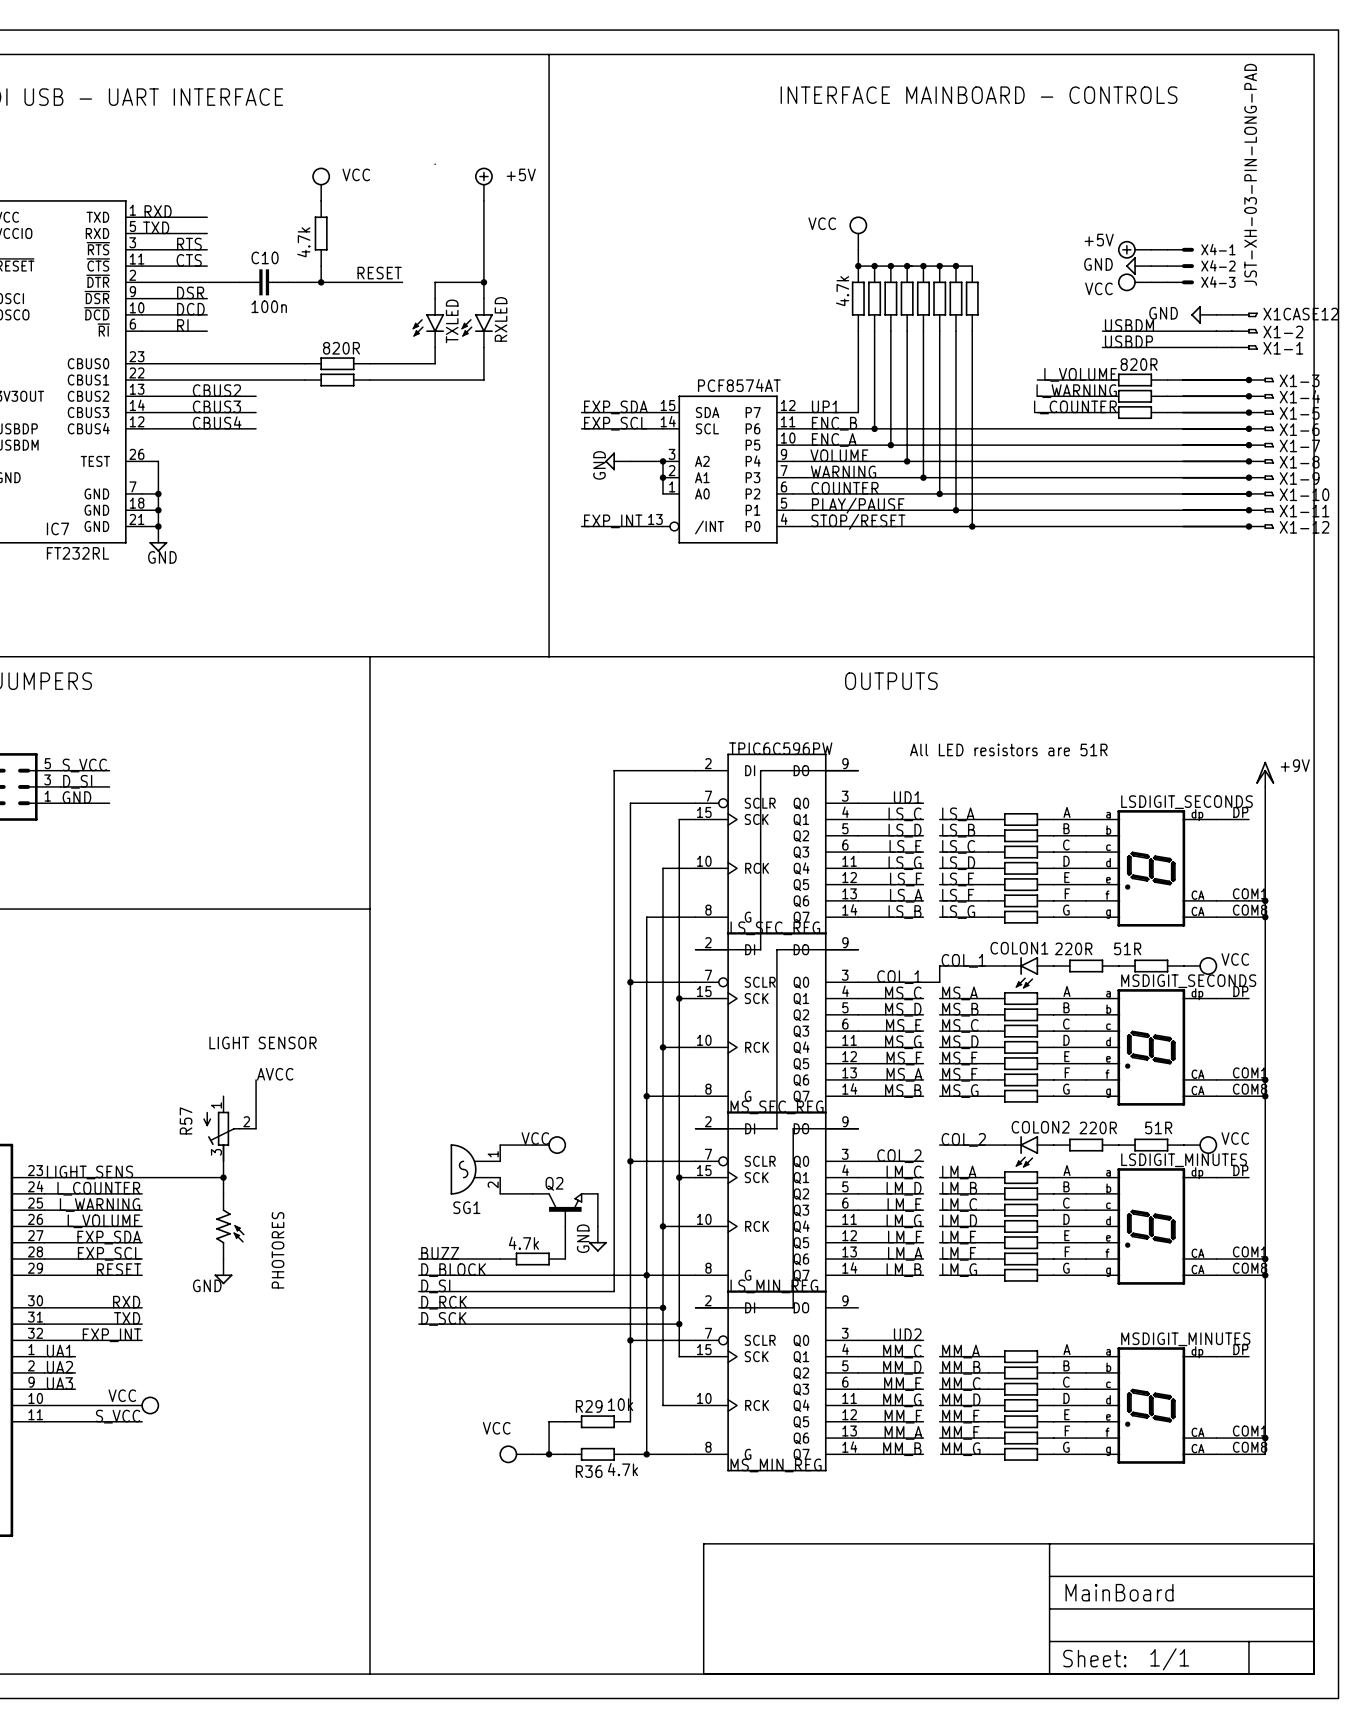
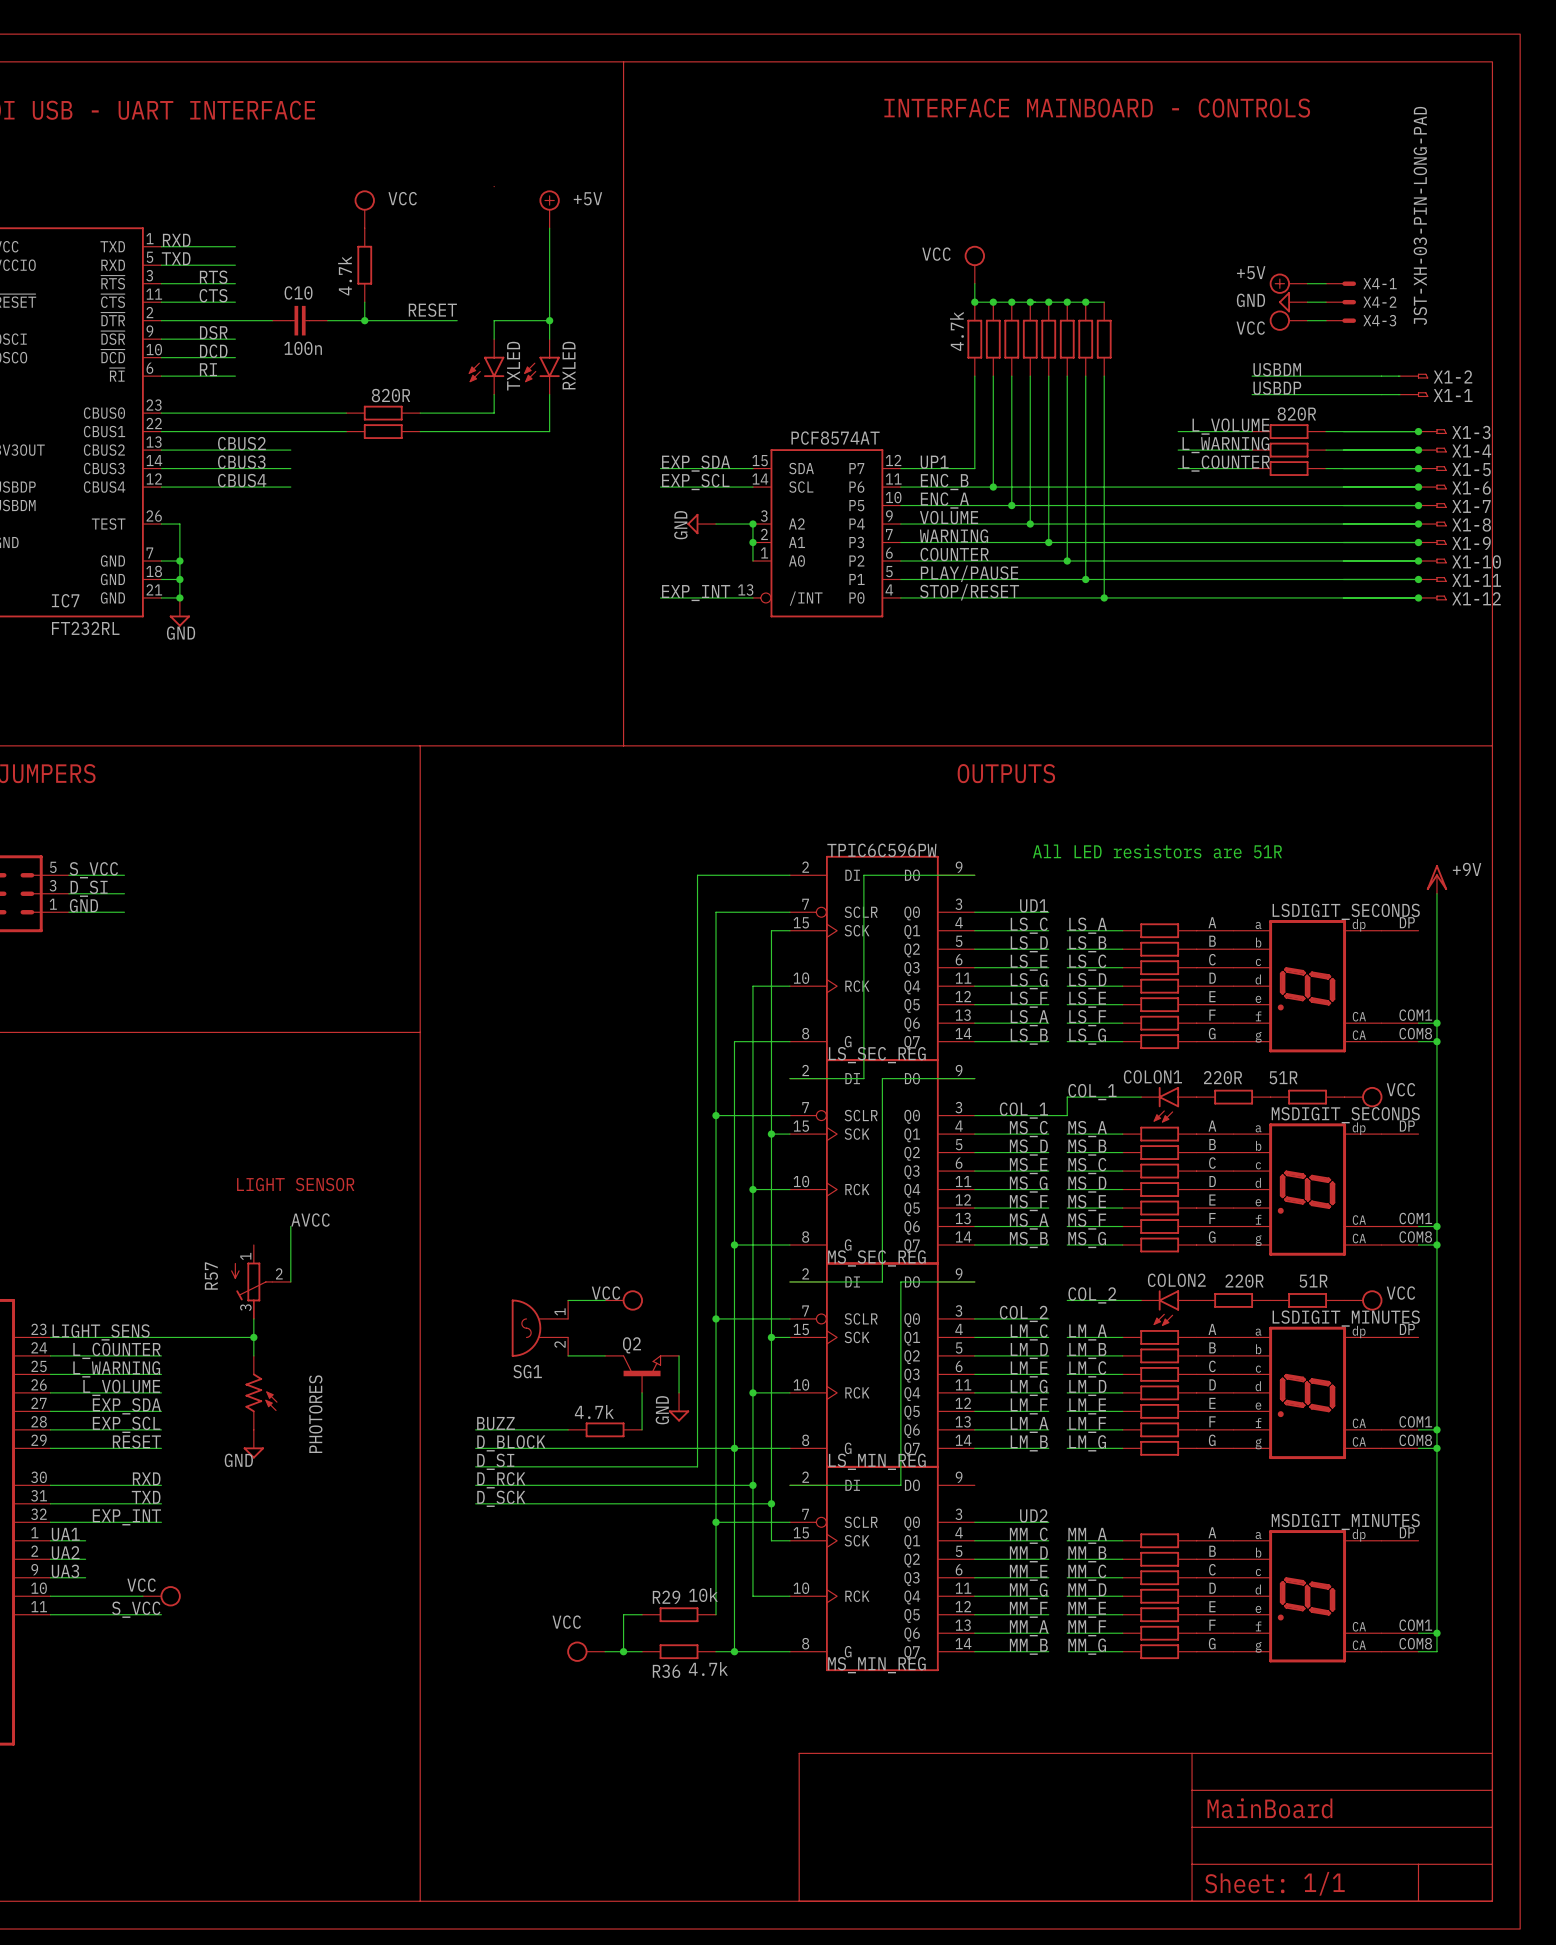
power symbol: GND (1203, 314) -> none
wire: (1216, 314) (1232, 314) -> none
X1CASE12: (1245, 314) -> none

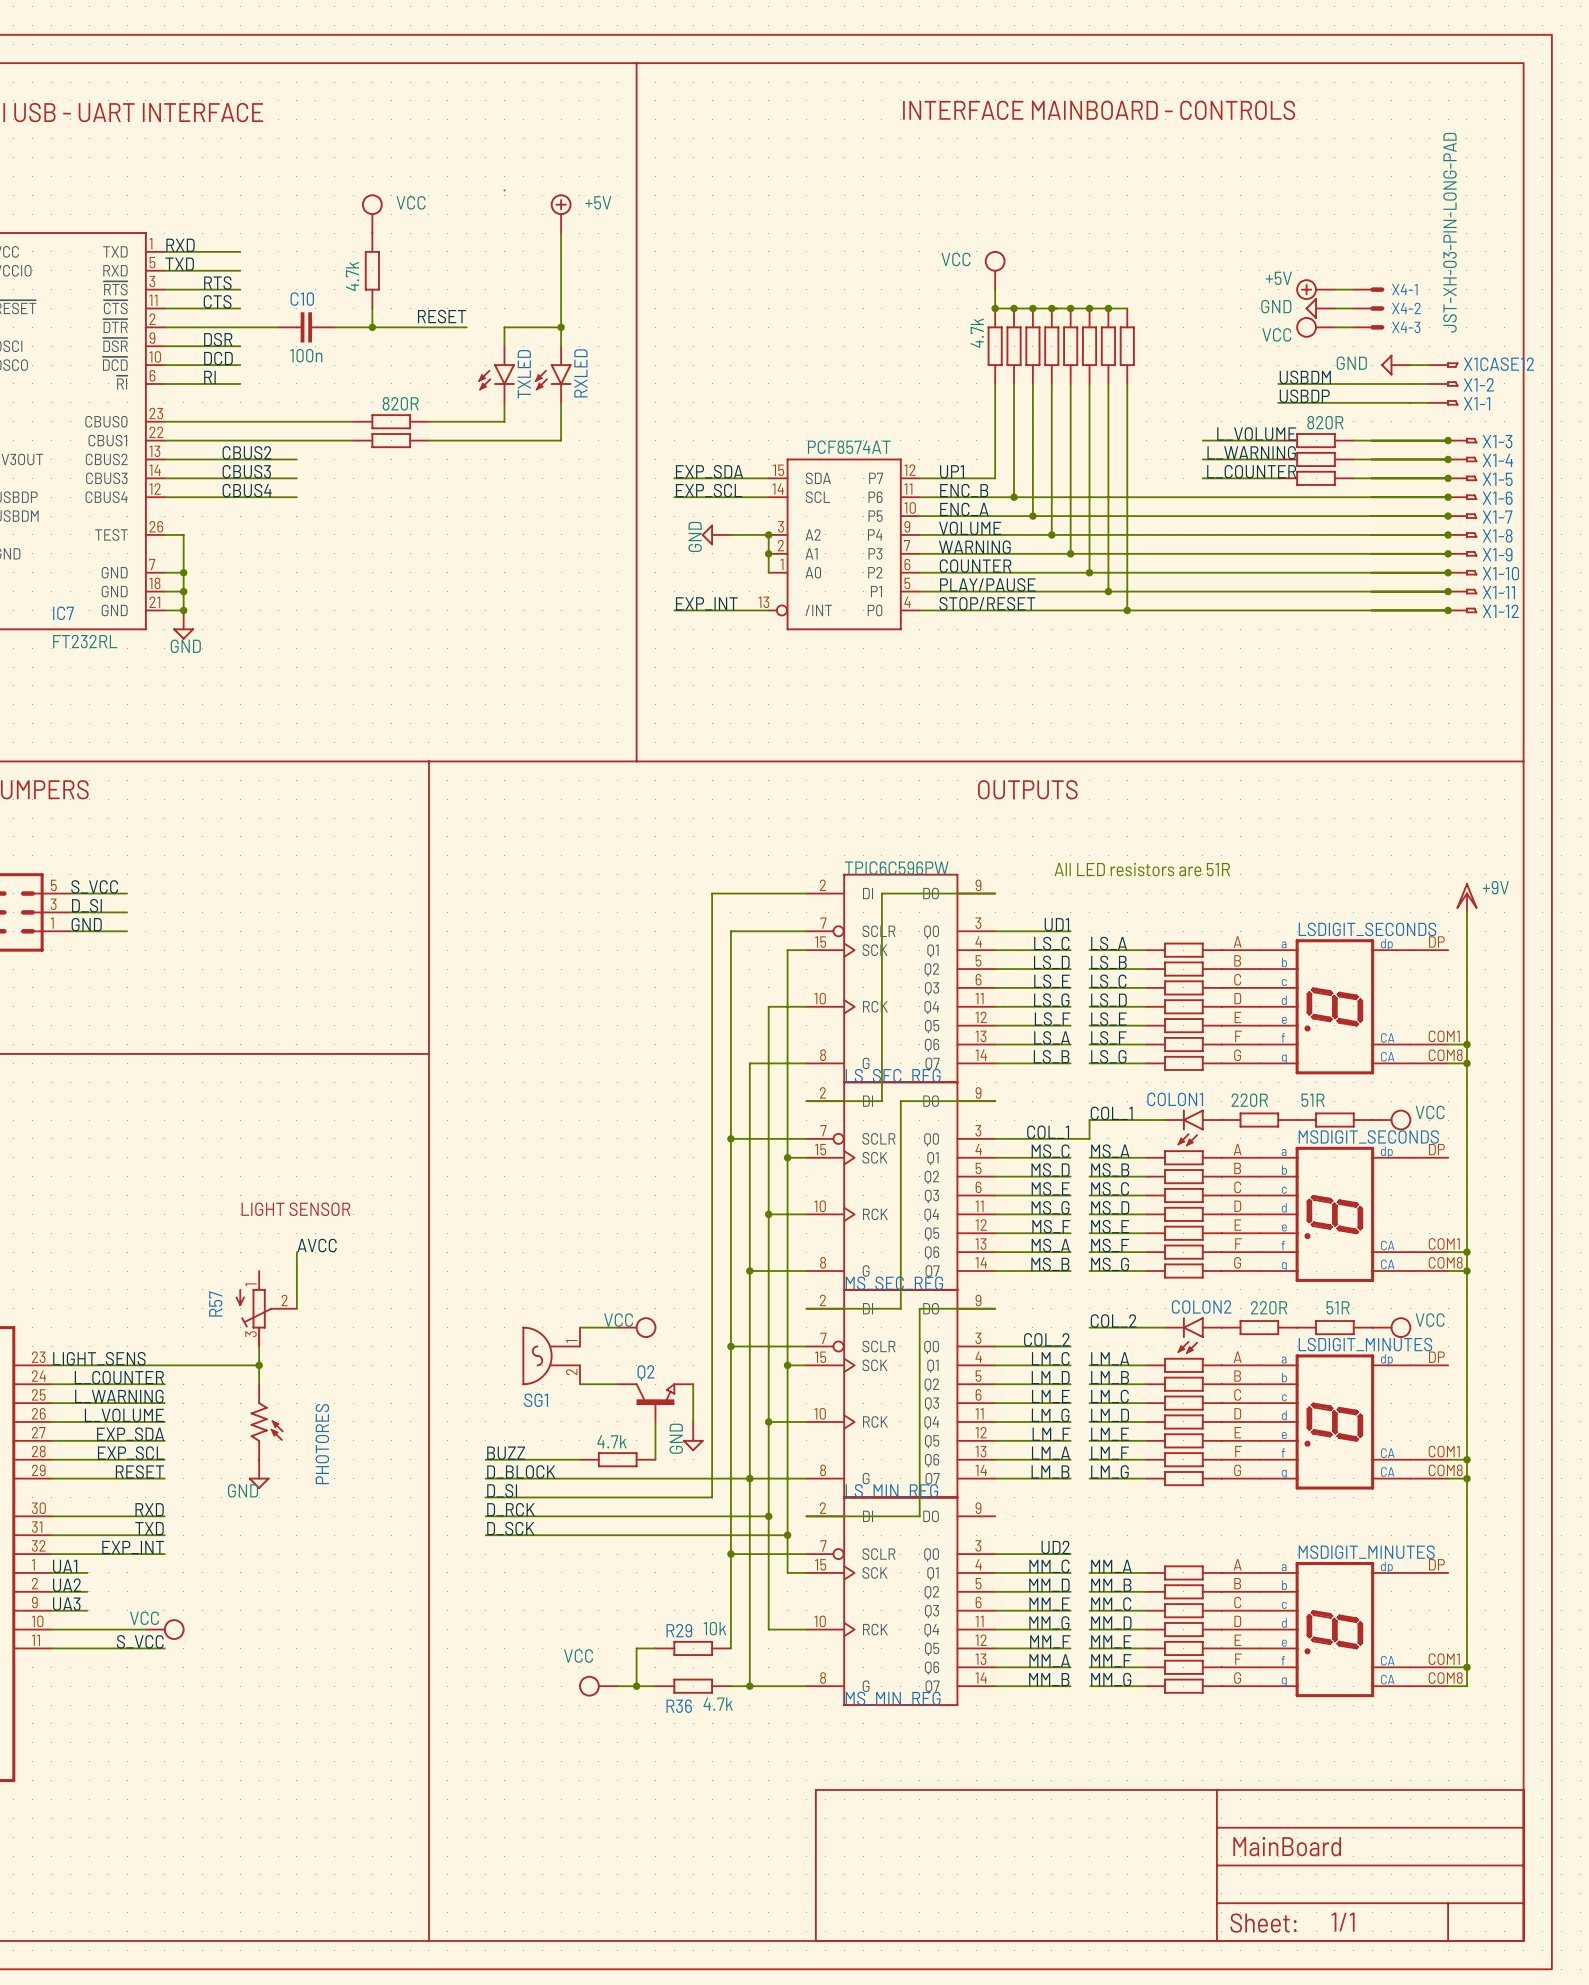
power symbol: none -> GND (1395, 365)
wire: none -> (1410, 365) (1429, 365)
X1CASE12: none -> (1443, 365)

